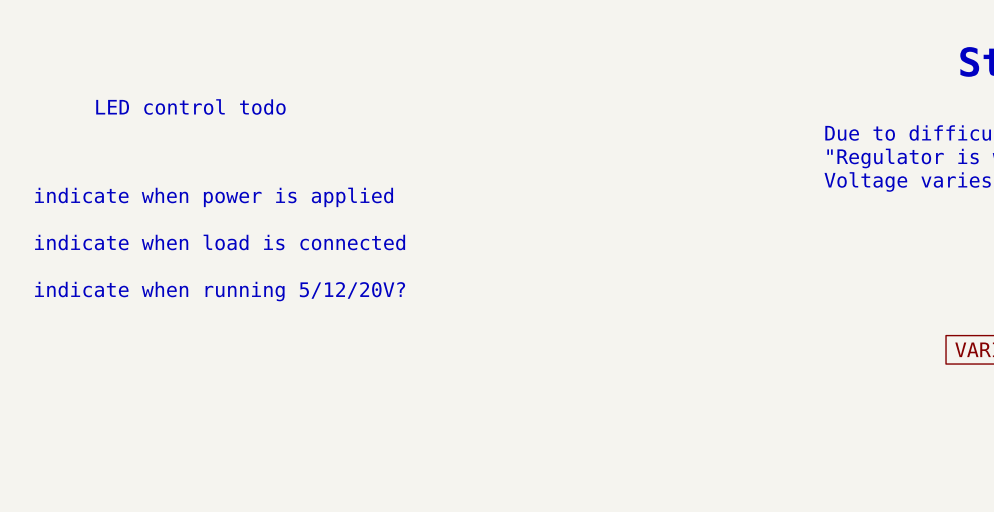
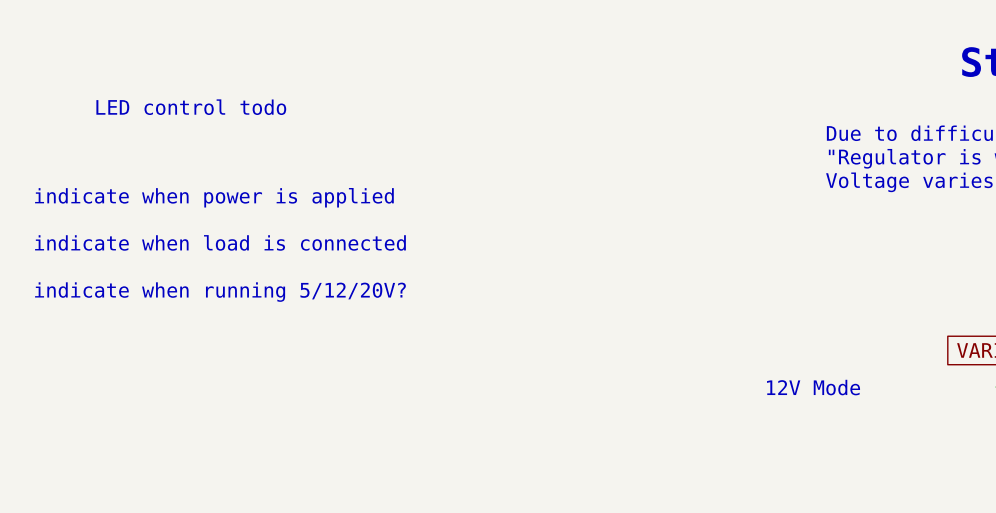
text: none -> 12V Mode (813, 387)

